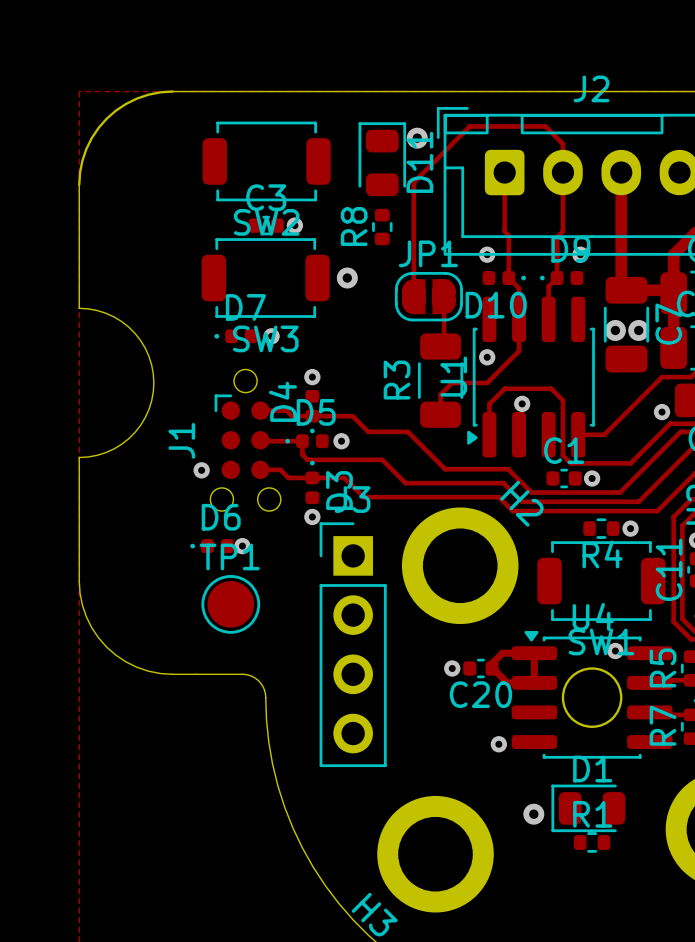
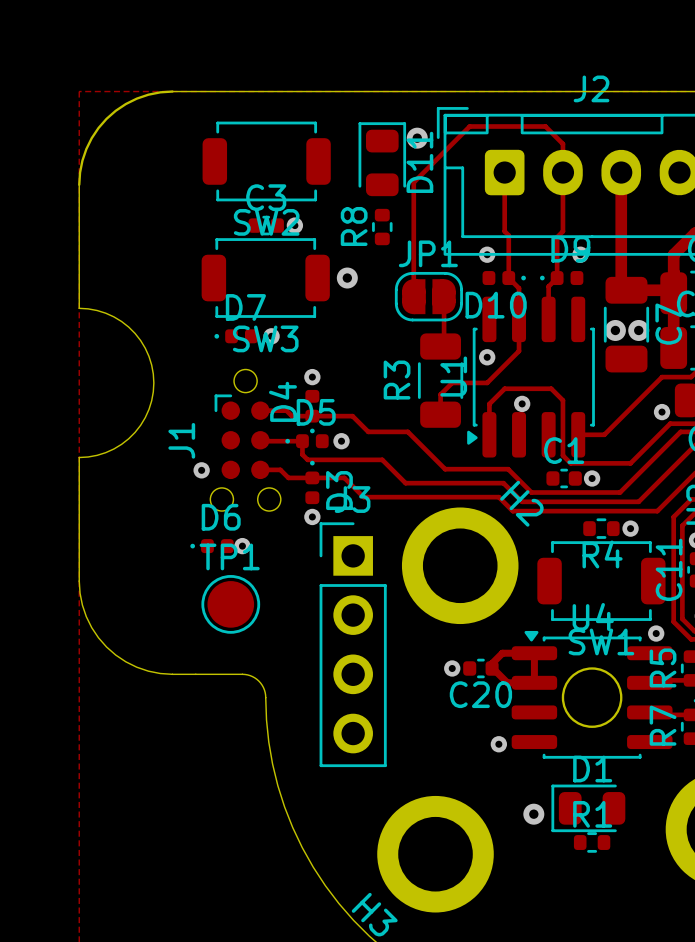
via position: (615, 651) -> (656, 633)

